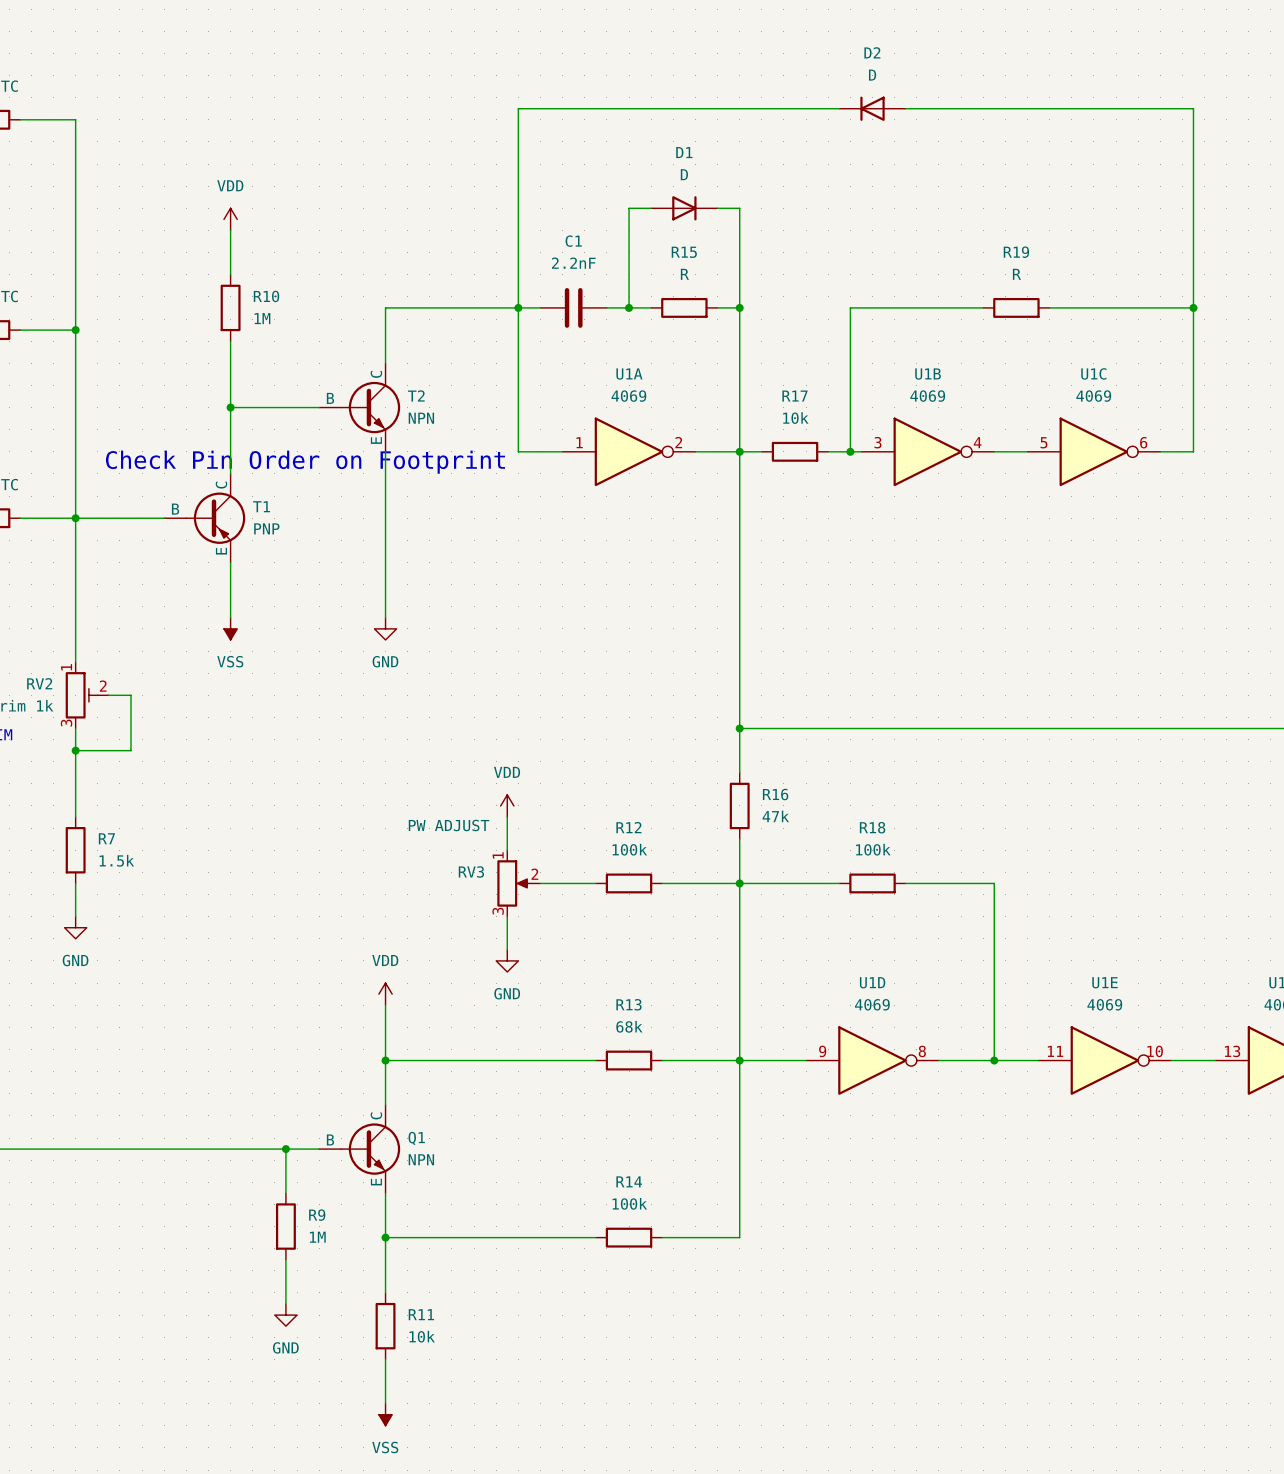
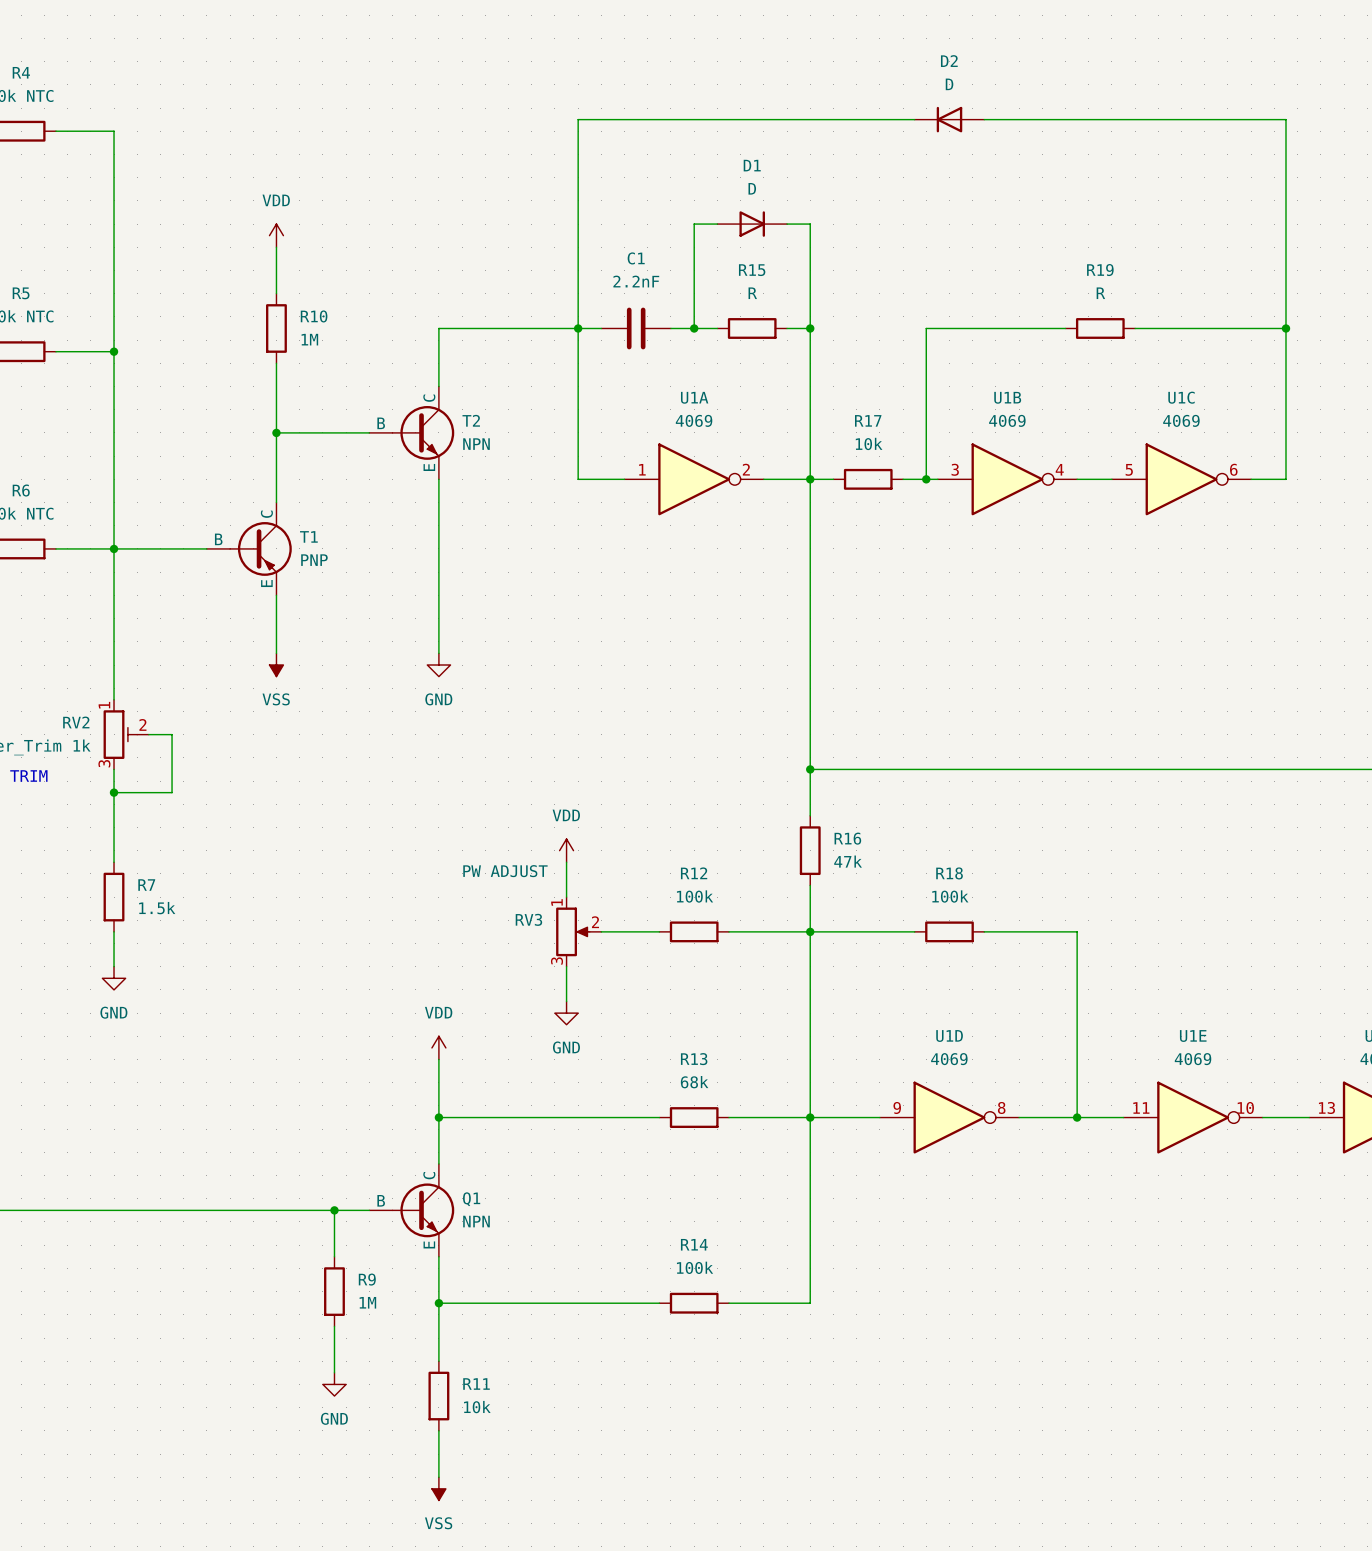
text: Check Pin Order on Footprint (305, 462) -> none

